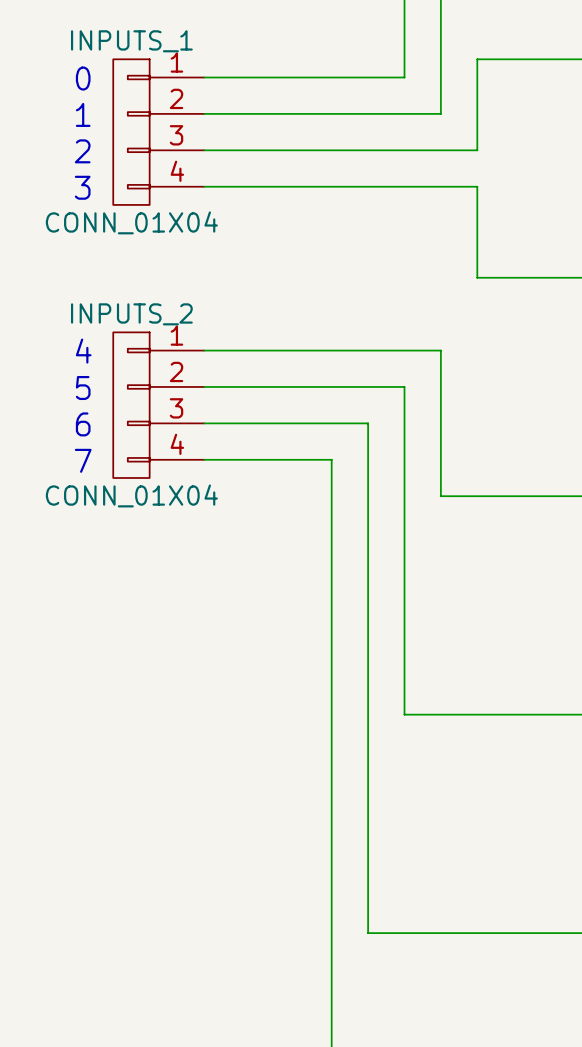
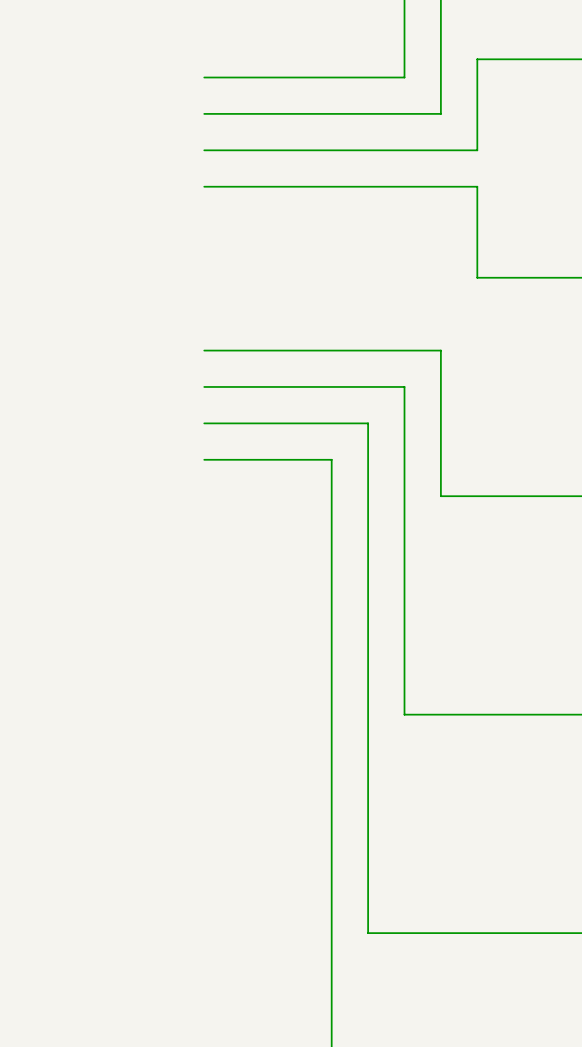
text: 0 (83, 78) -> none
text: 1 (83, 114) -> none
INPUTS_1: CONN_01X04 (158, 132) -> none
text: 2 (82, 151) -> none
text: 3 (82, 187) -> none
text: 4 (83, 351) -> none
text: 5 (83, 388) -> none
INPUTS_2: CONN_01X04 (158, 405) -> none
text: 6 (83, 424) -> none
text: 7 (83, 460) -> none

